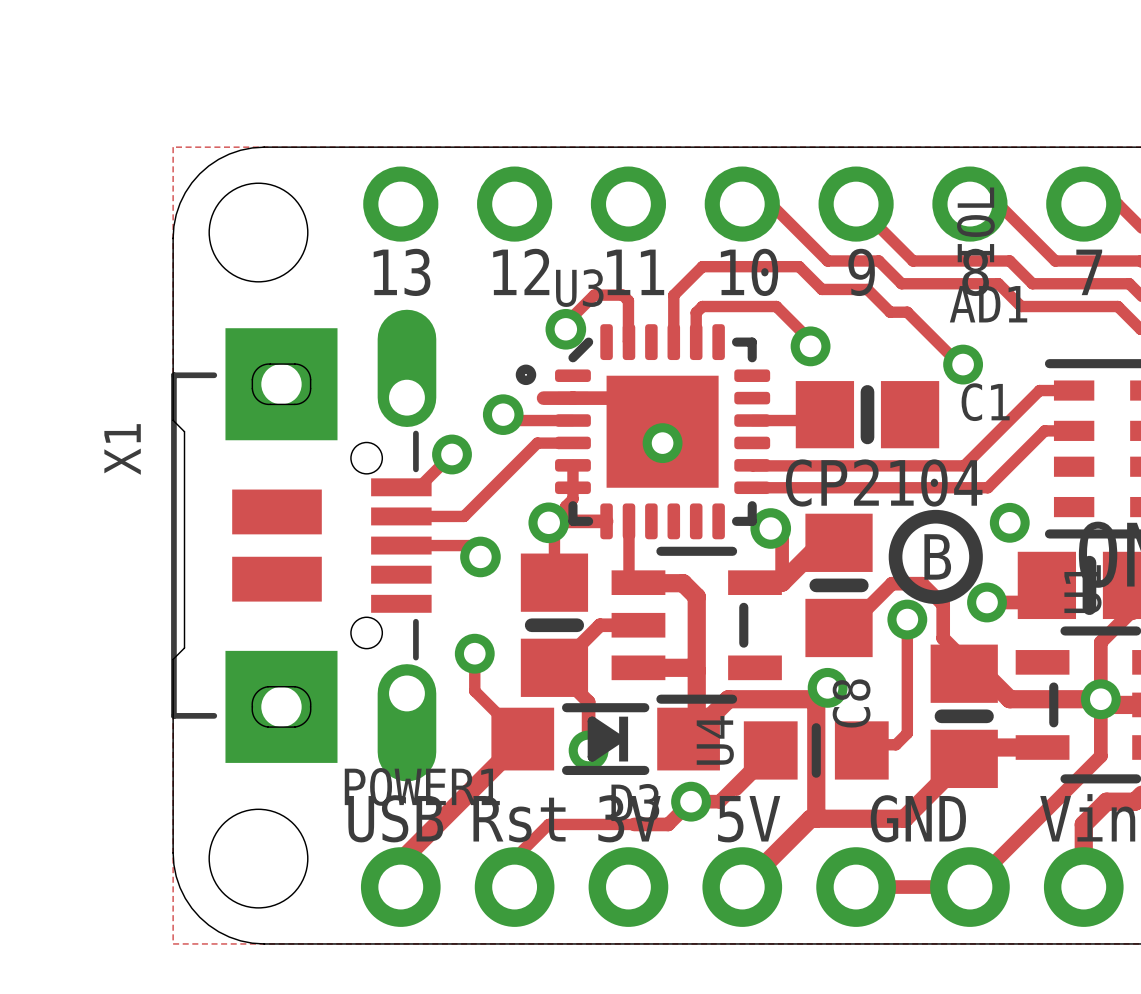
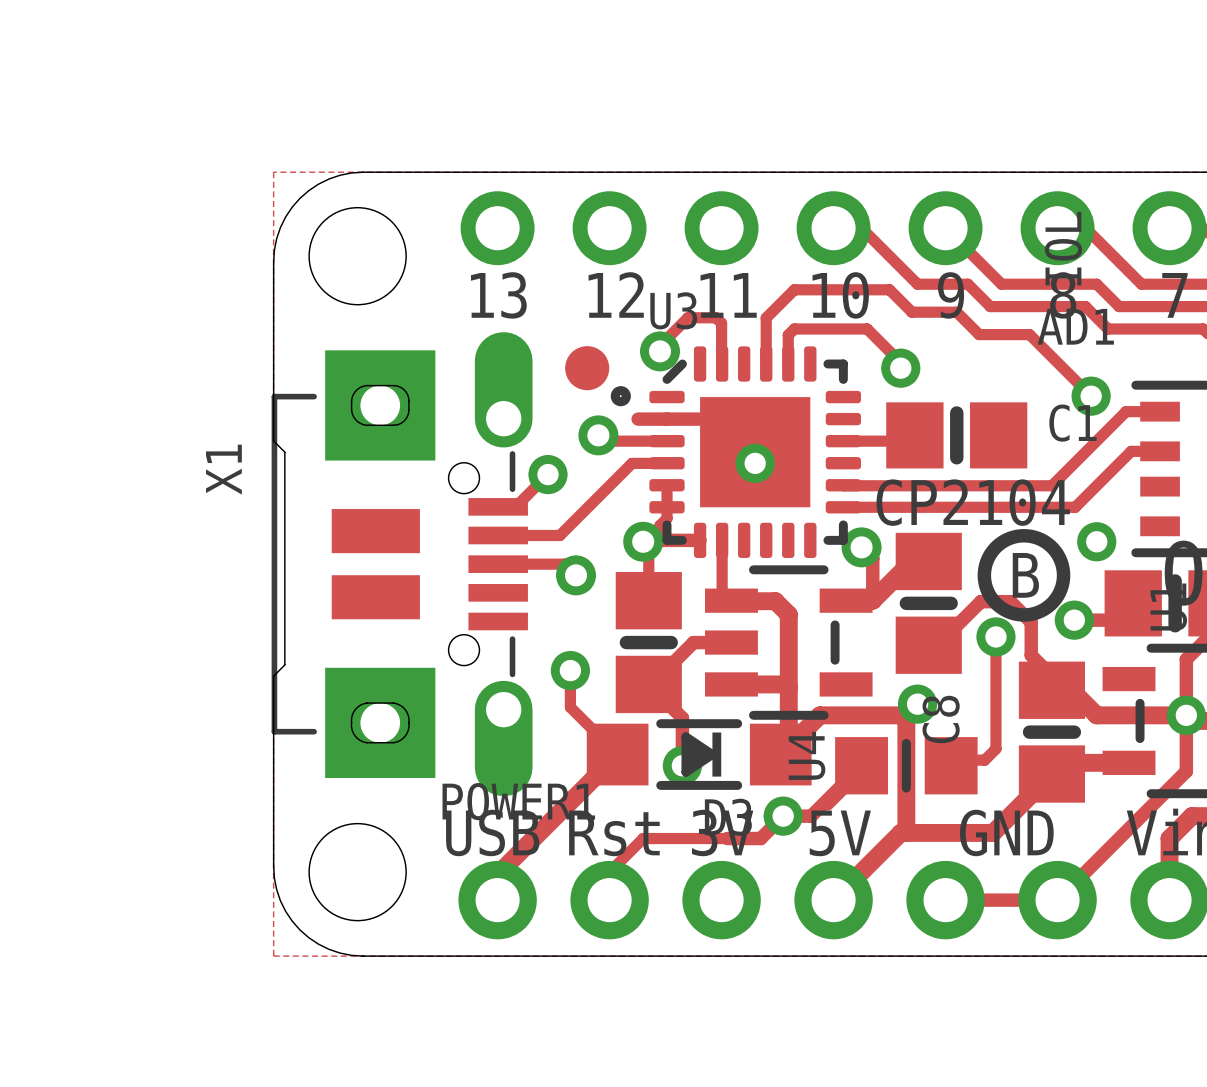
track: (907, 312) (959, 364) (963, 364) -> (995, 334) (1029, 334) (1091, 396)
part: none -> (587, 368)
via position: (963, 364) -> (1091, 396)

